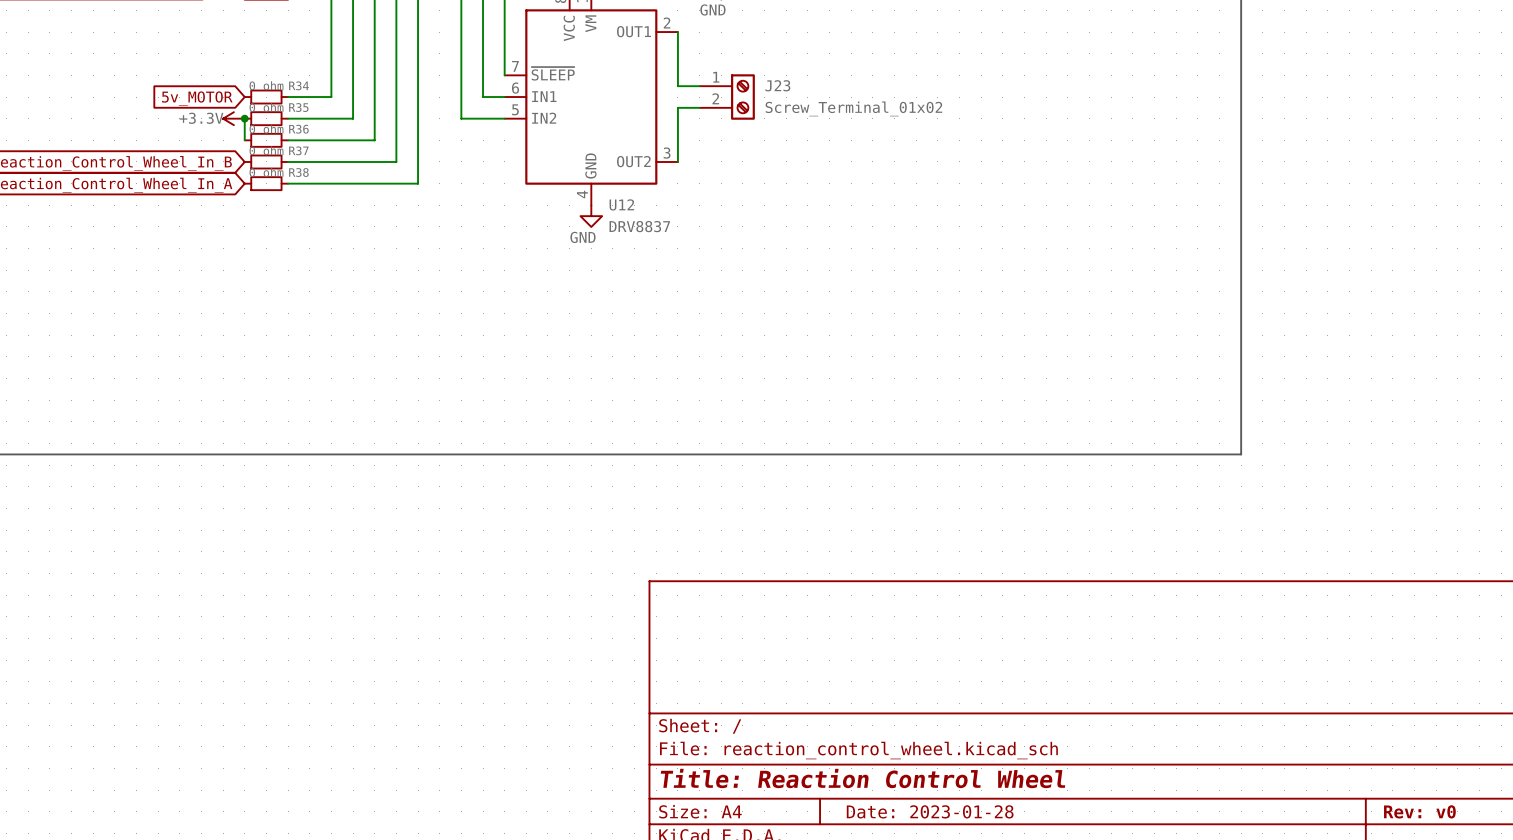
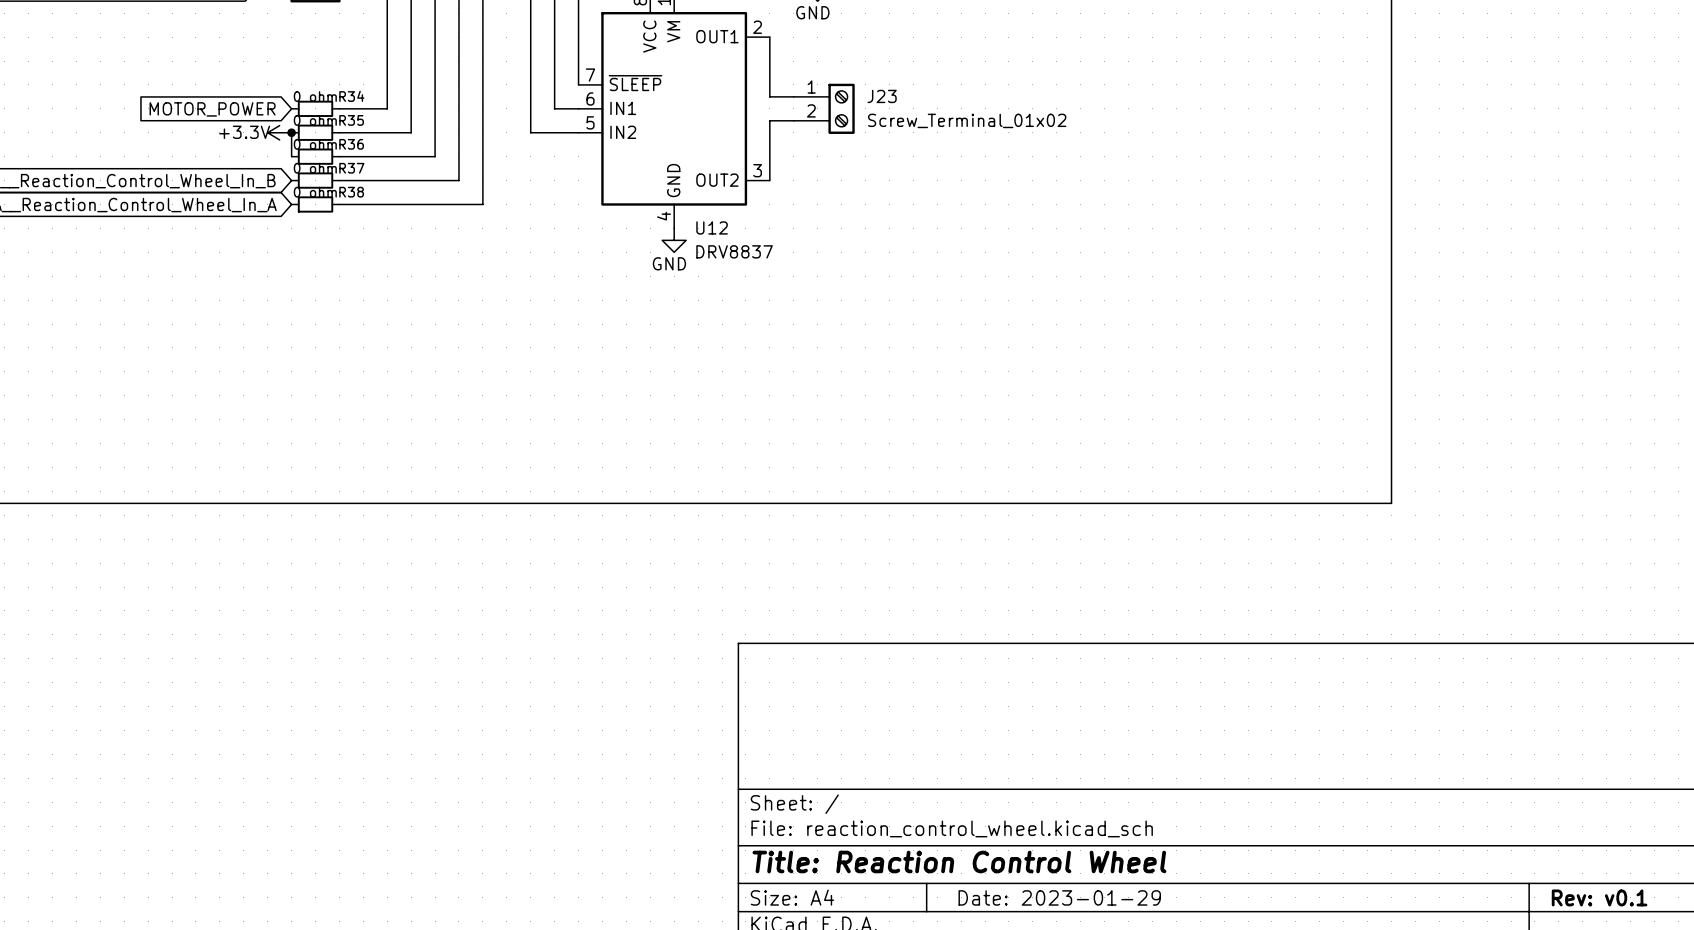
global label: 5v_MOTOR (197, 98) -> MOTOR_POWER (212, 109)
title block: Date: 2023-01-28 (930, 811) -> Date: 2023-01-29 (1059, 897)
title block: Rev: v0 (1419, 811) -> Rev: v0.1 (1599, 897)

